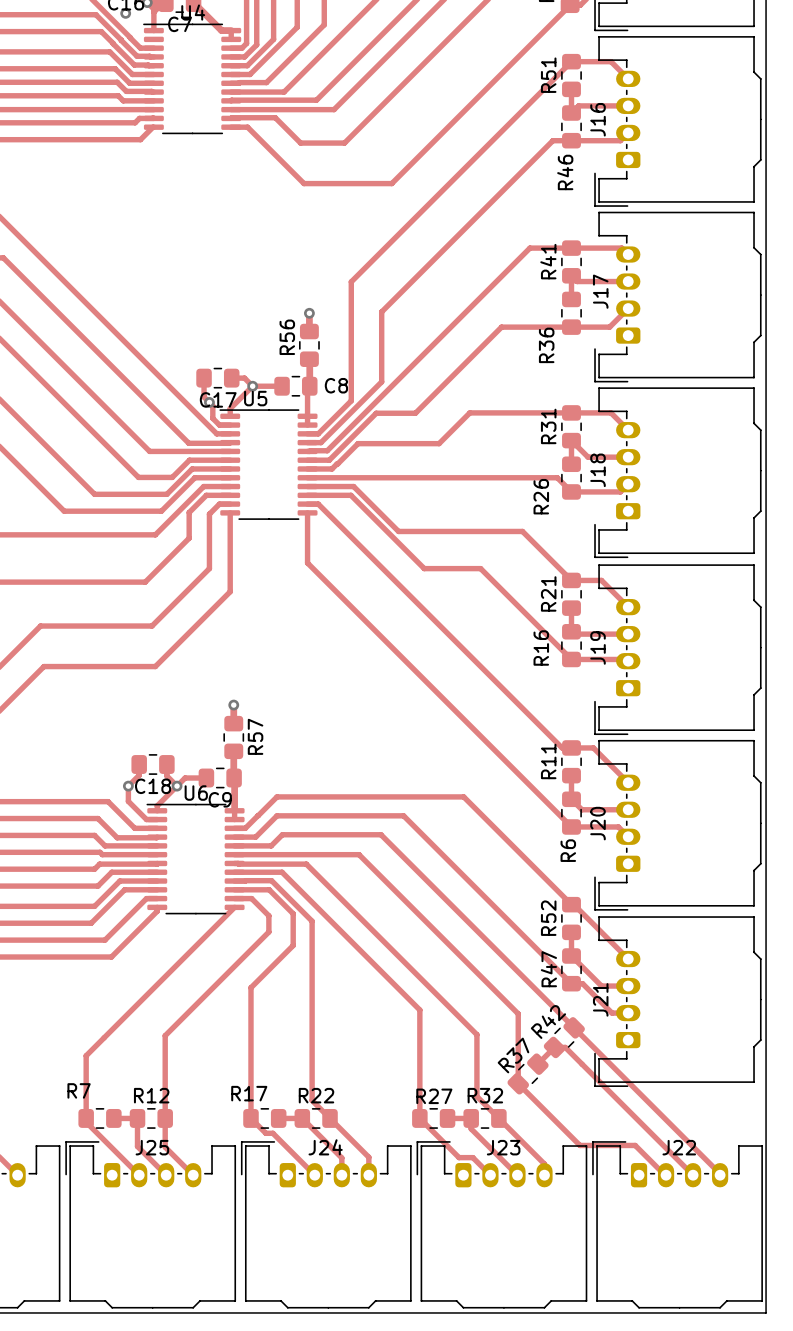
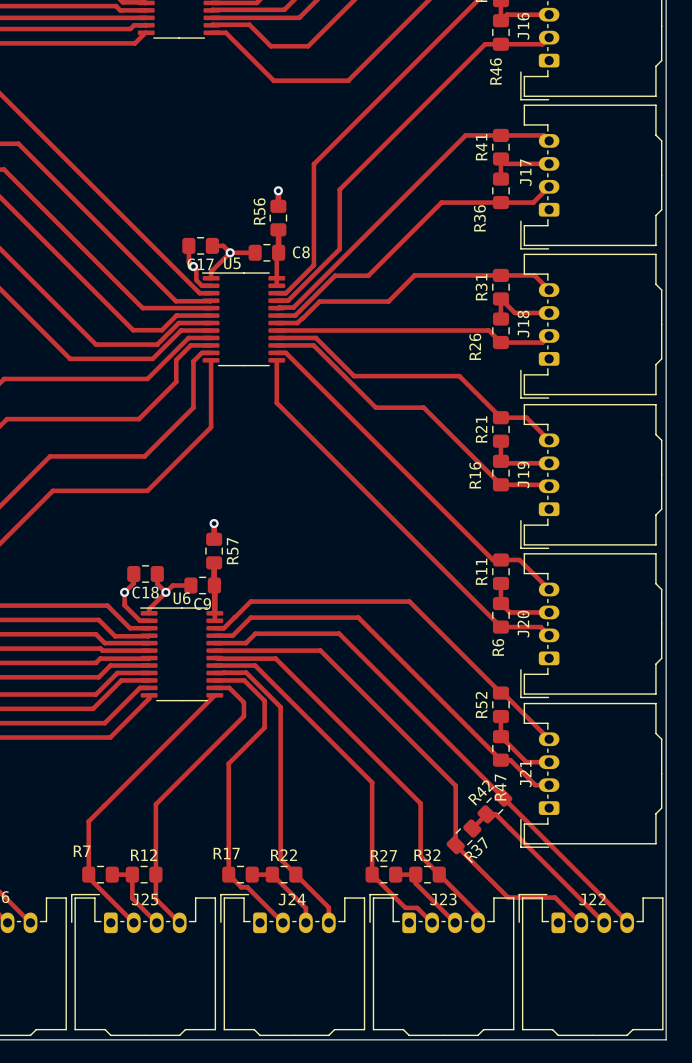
R47 name position: R47 (548, 969) -> R47 (500, 787)
R37 name position: R37 (513, 1055) -> R37 (475, 849)

